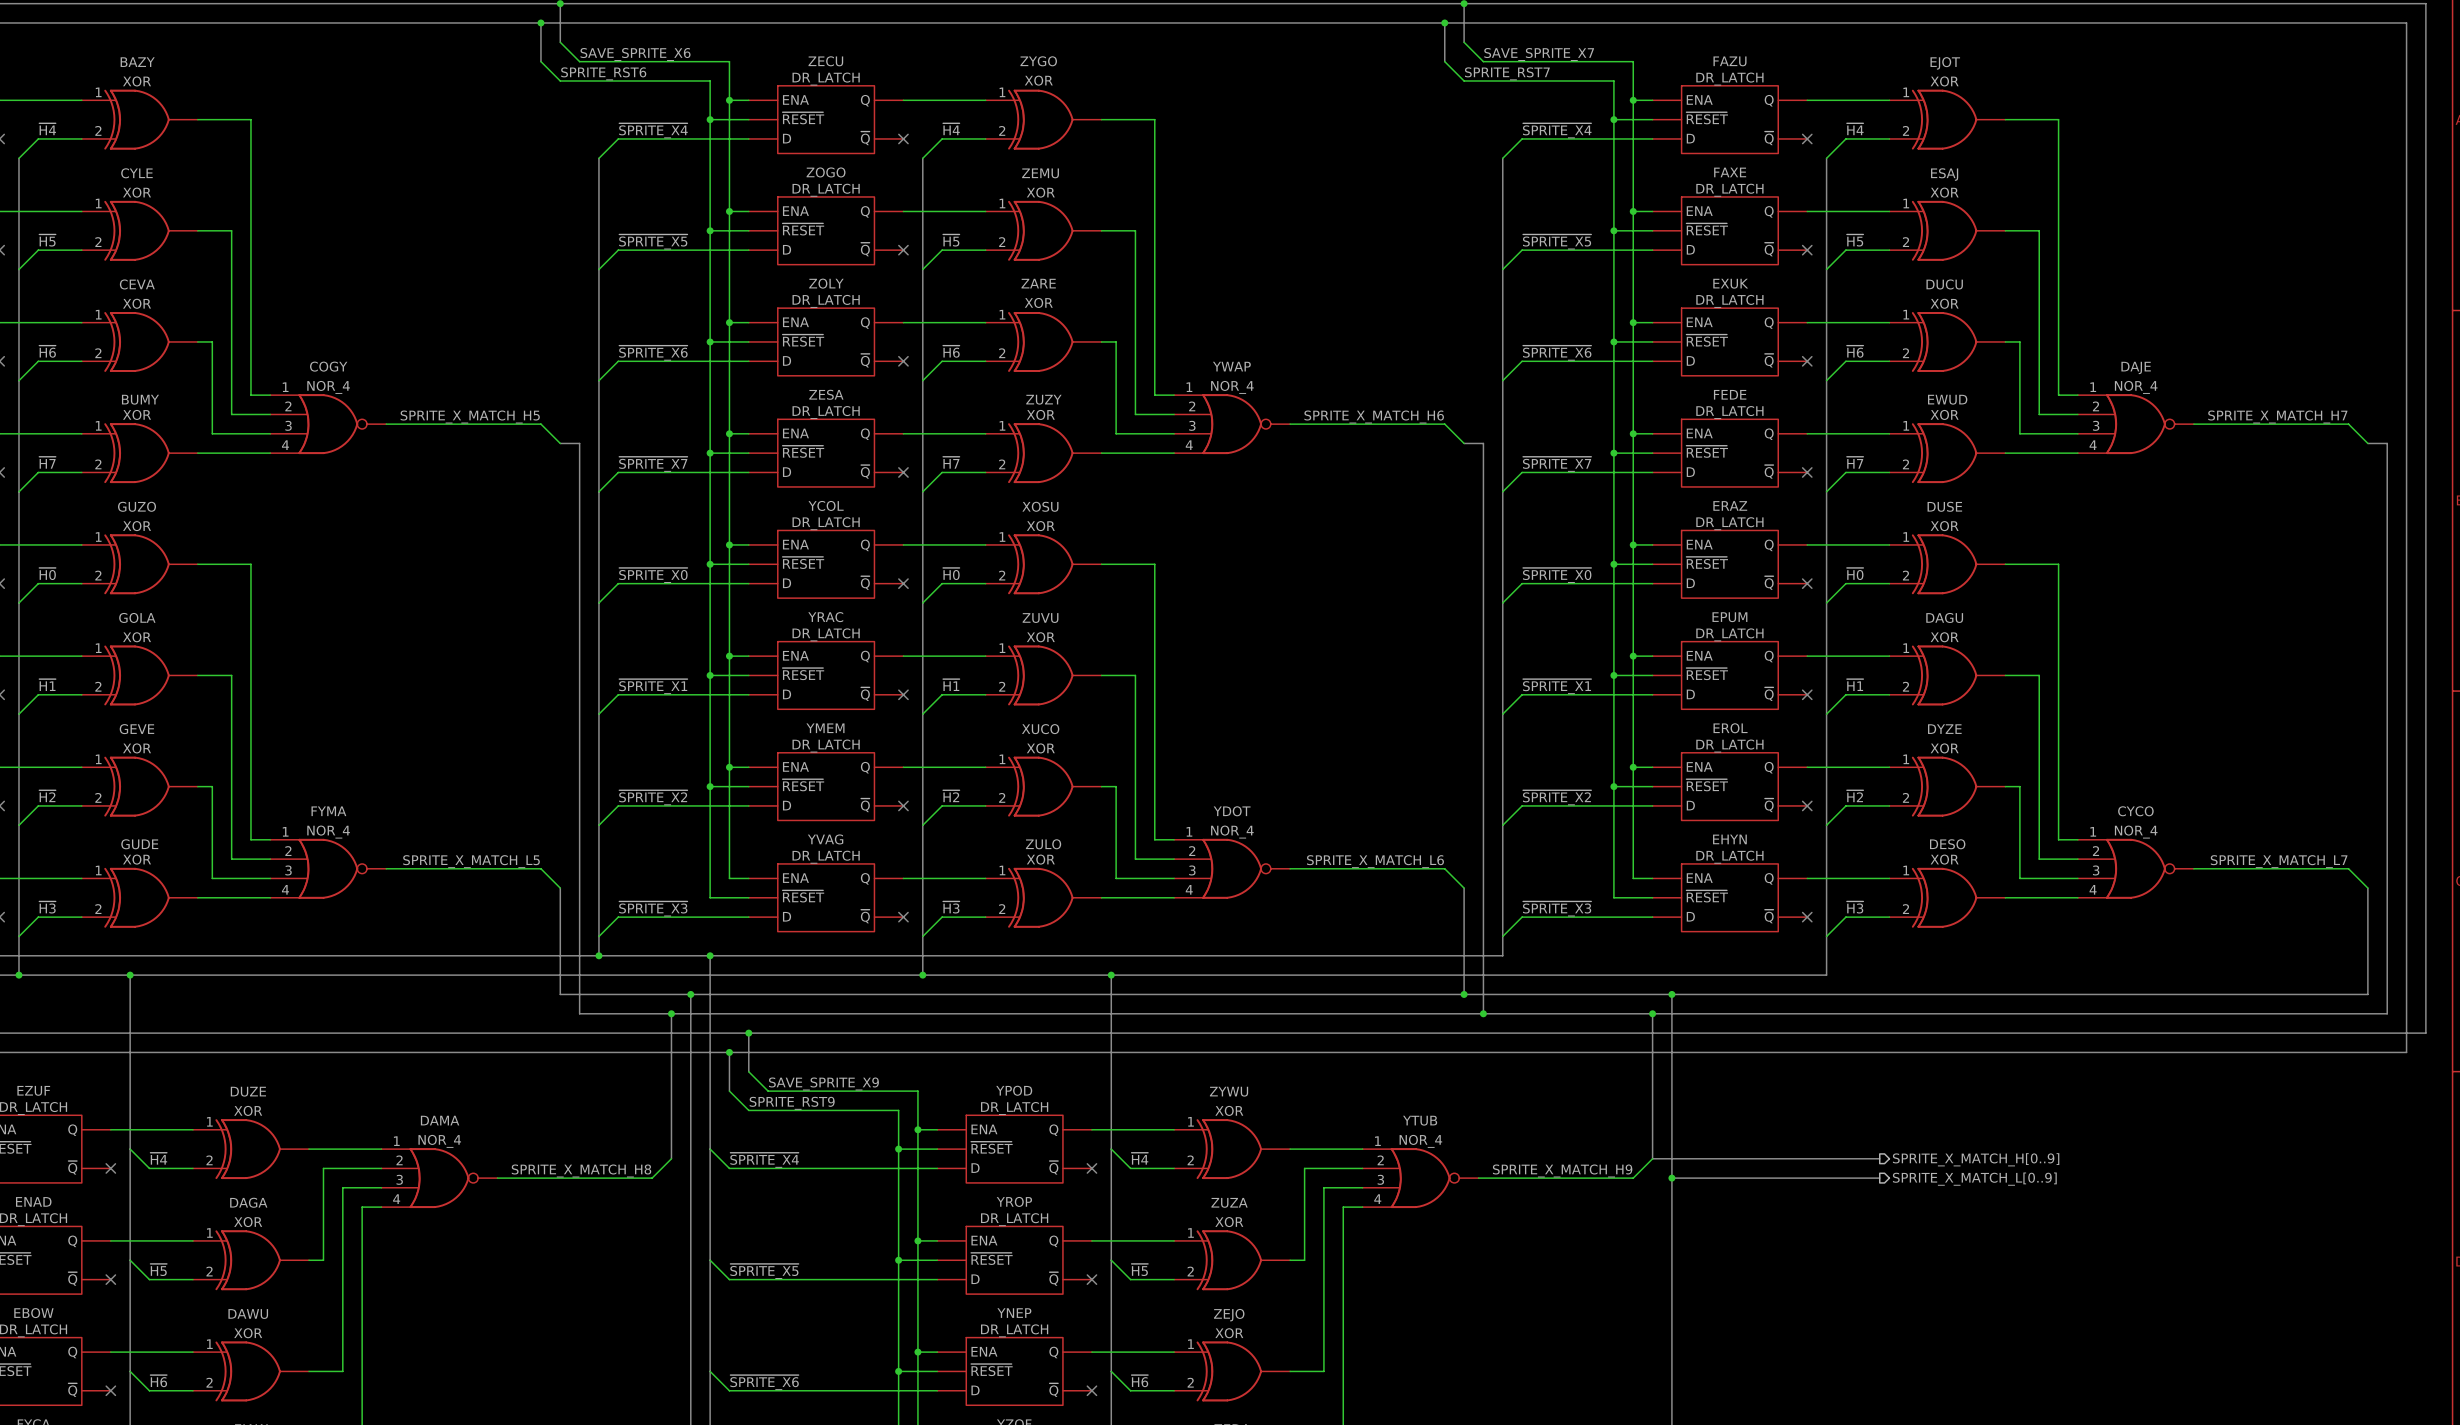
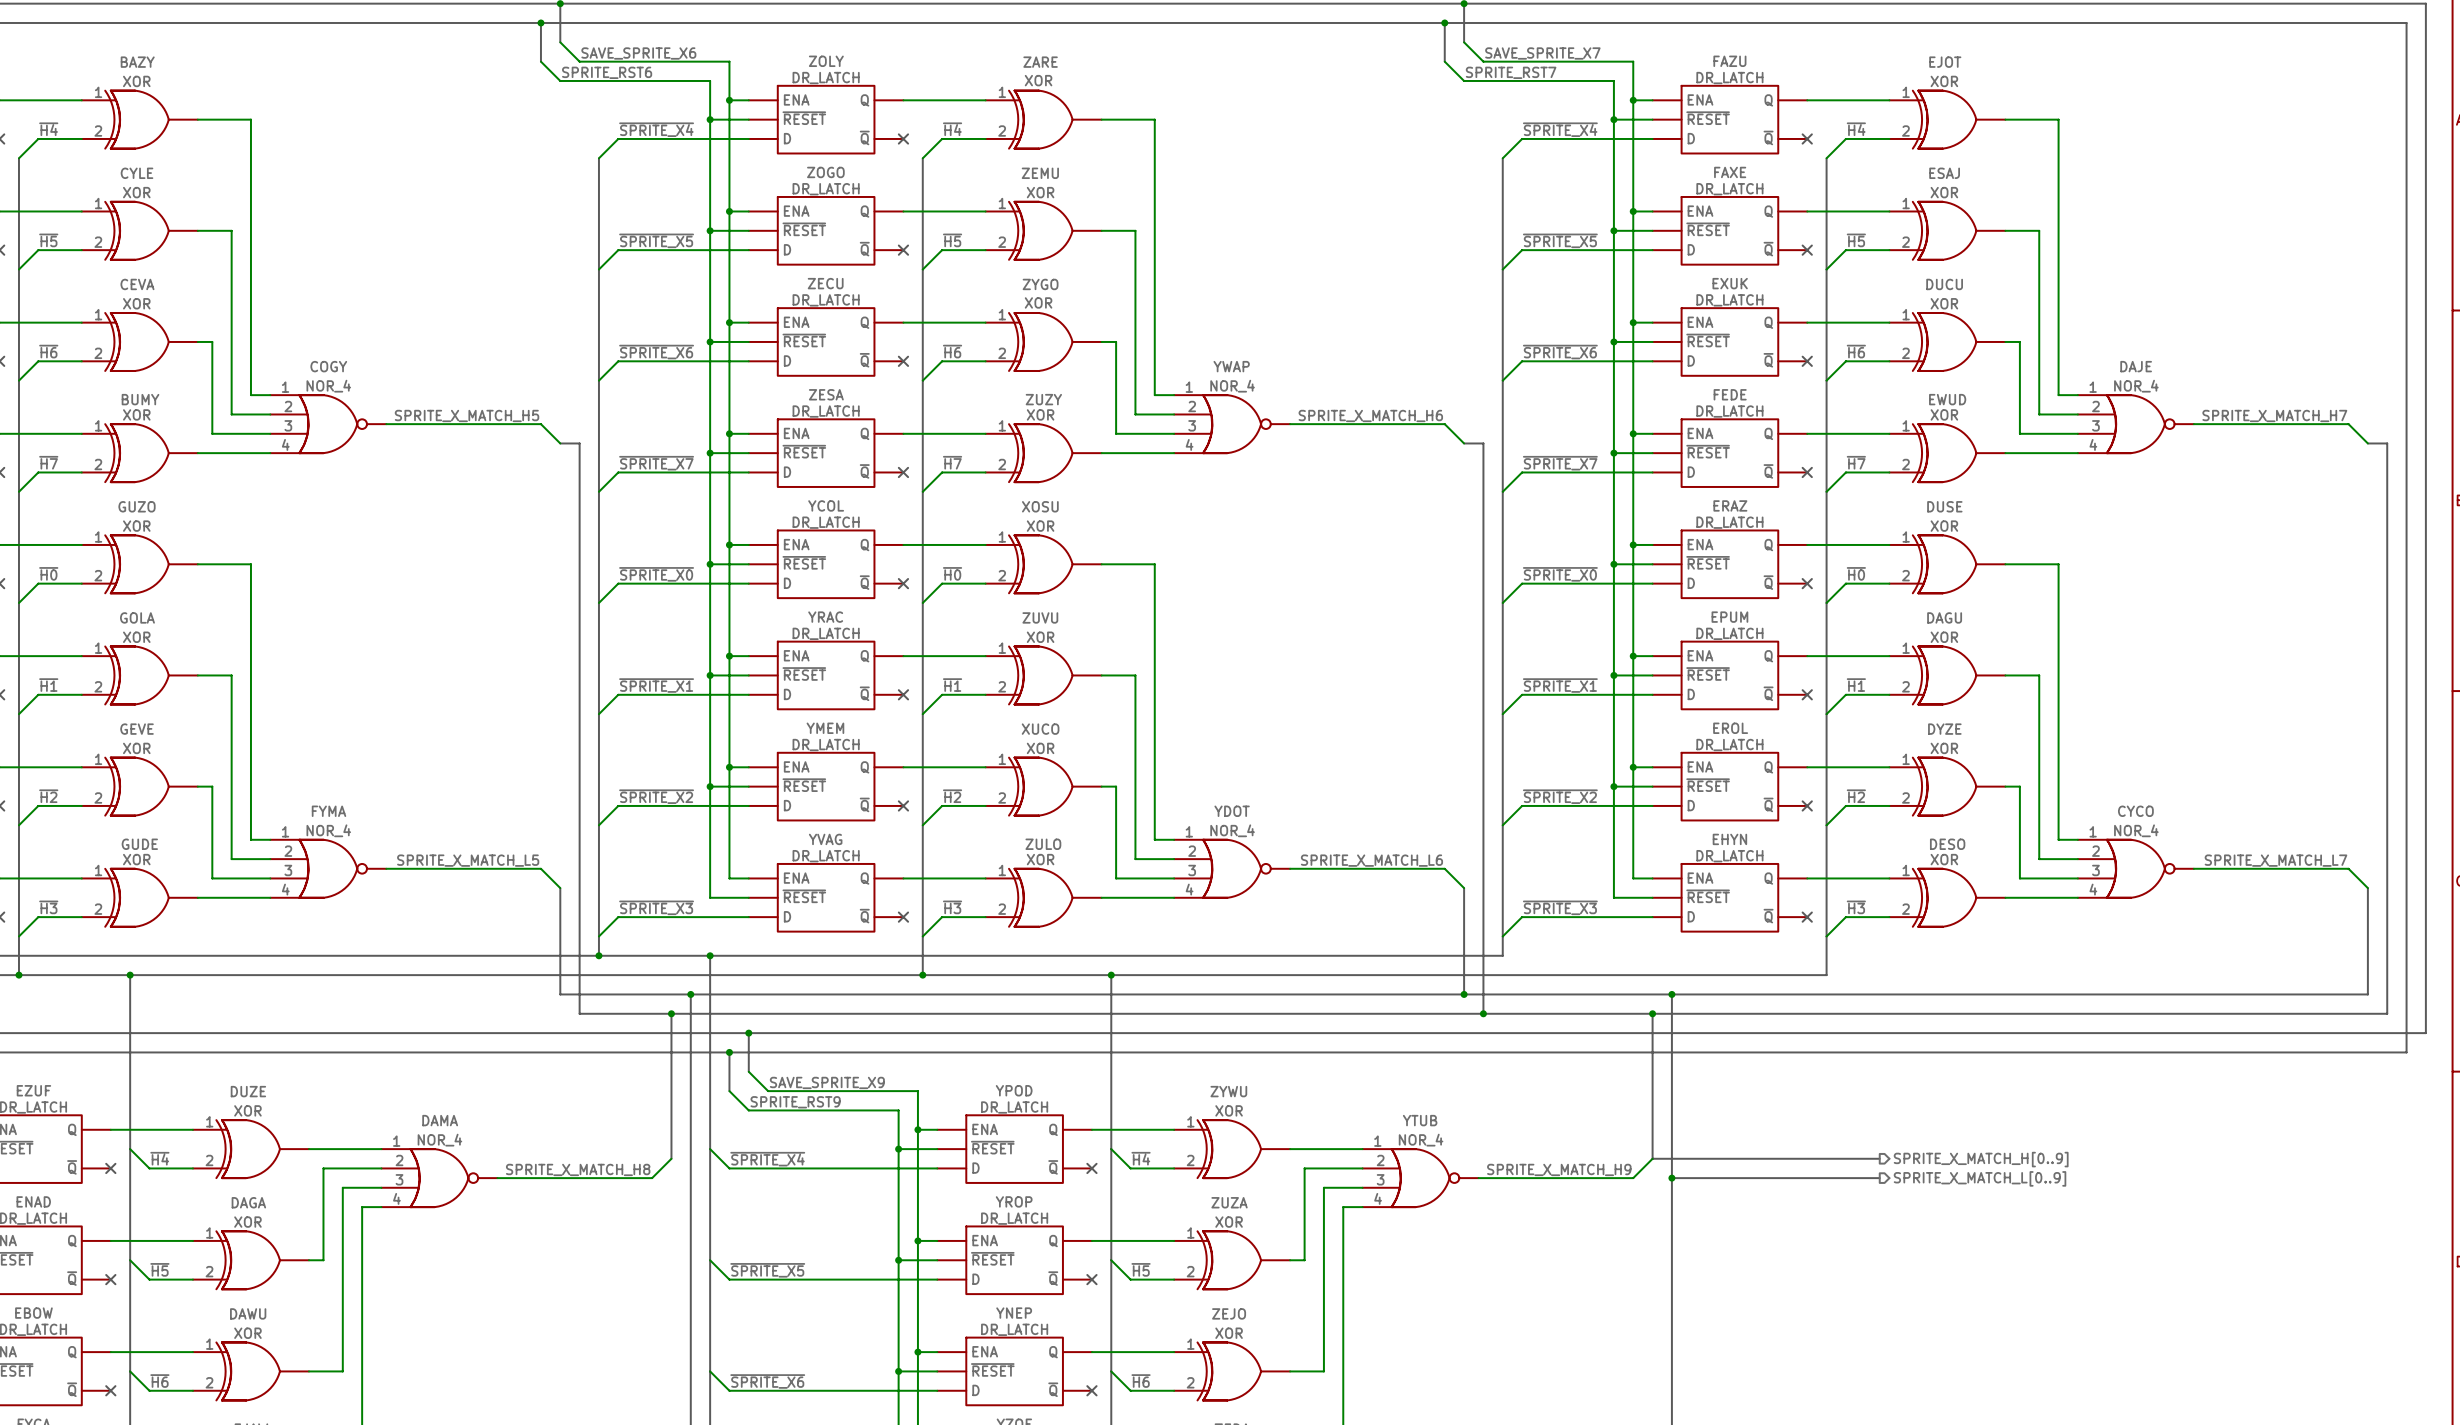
ZECU name: ZECU (825, 61) -> ZOLY (826, 61)
ZYGO name: ZYGO (1038, 61) -> ZARE (1040, 62)
ZOLY name: ZOLY (826, 283) -> ZECU (825, 283)
ZARE name: ZARE (1038, 283) -> ZYGO (1040, 284)

